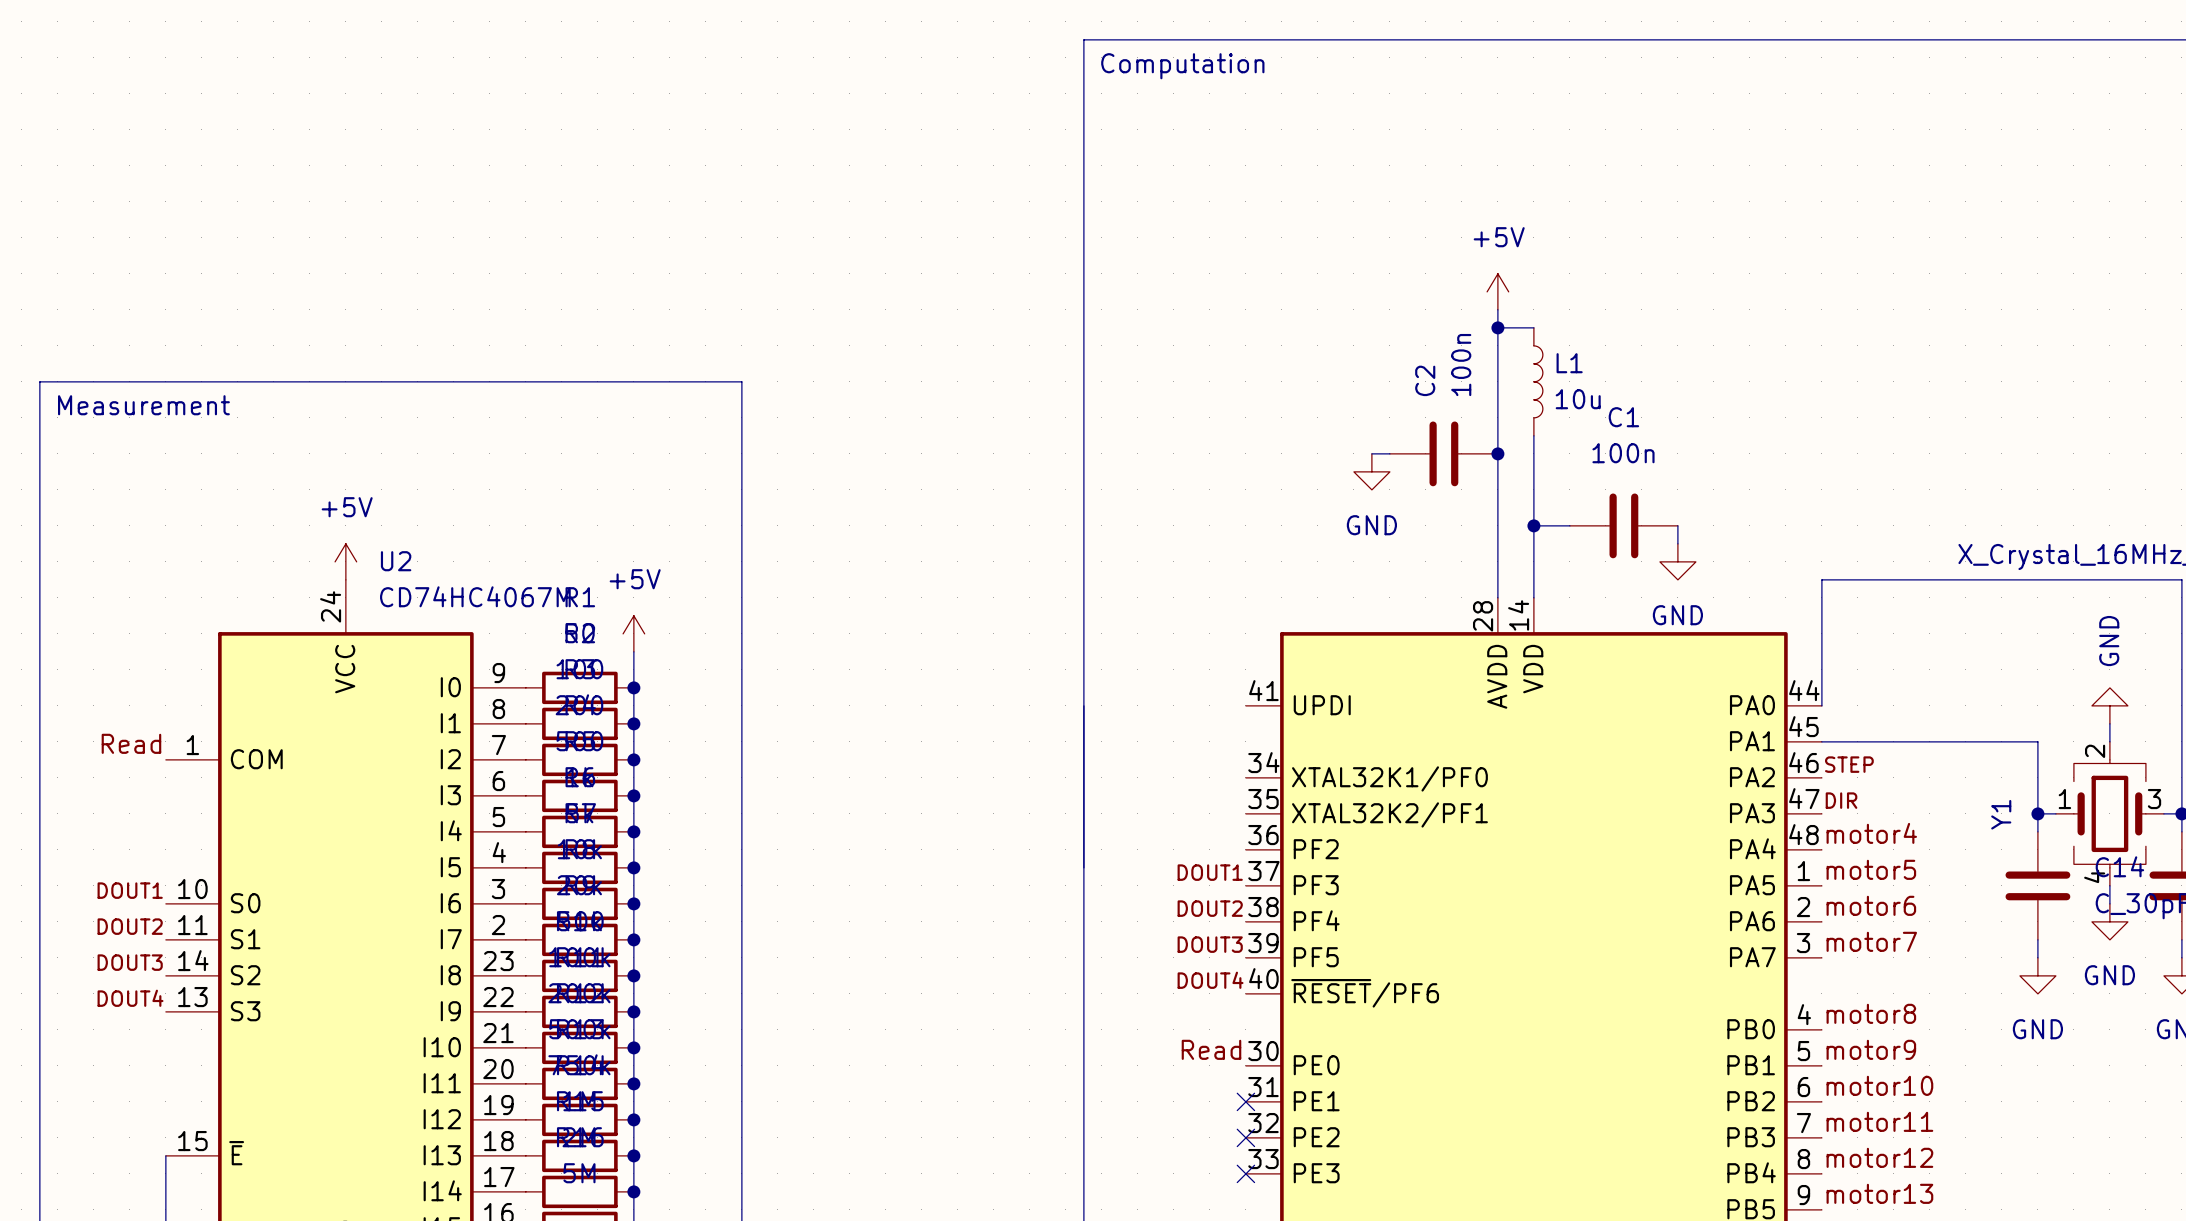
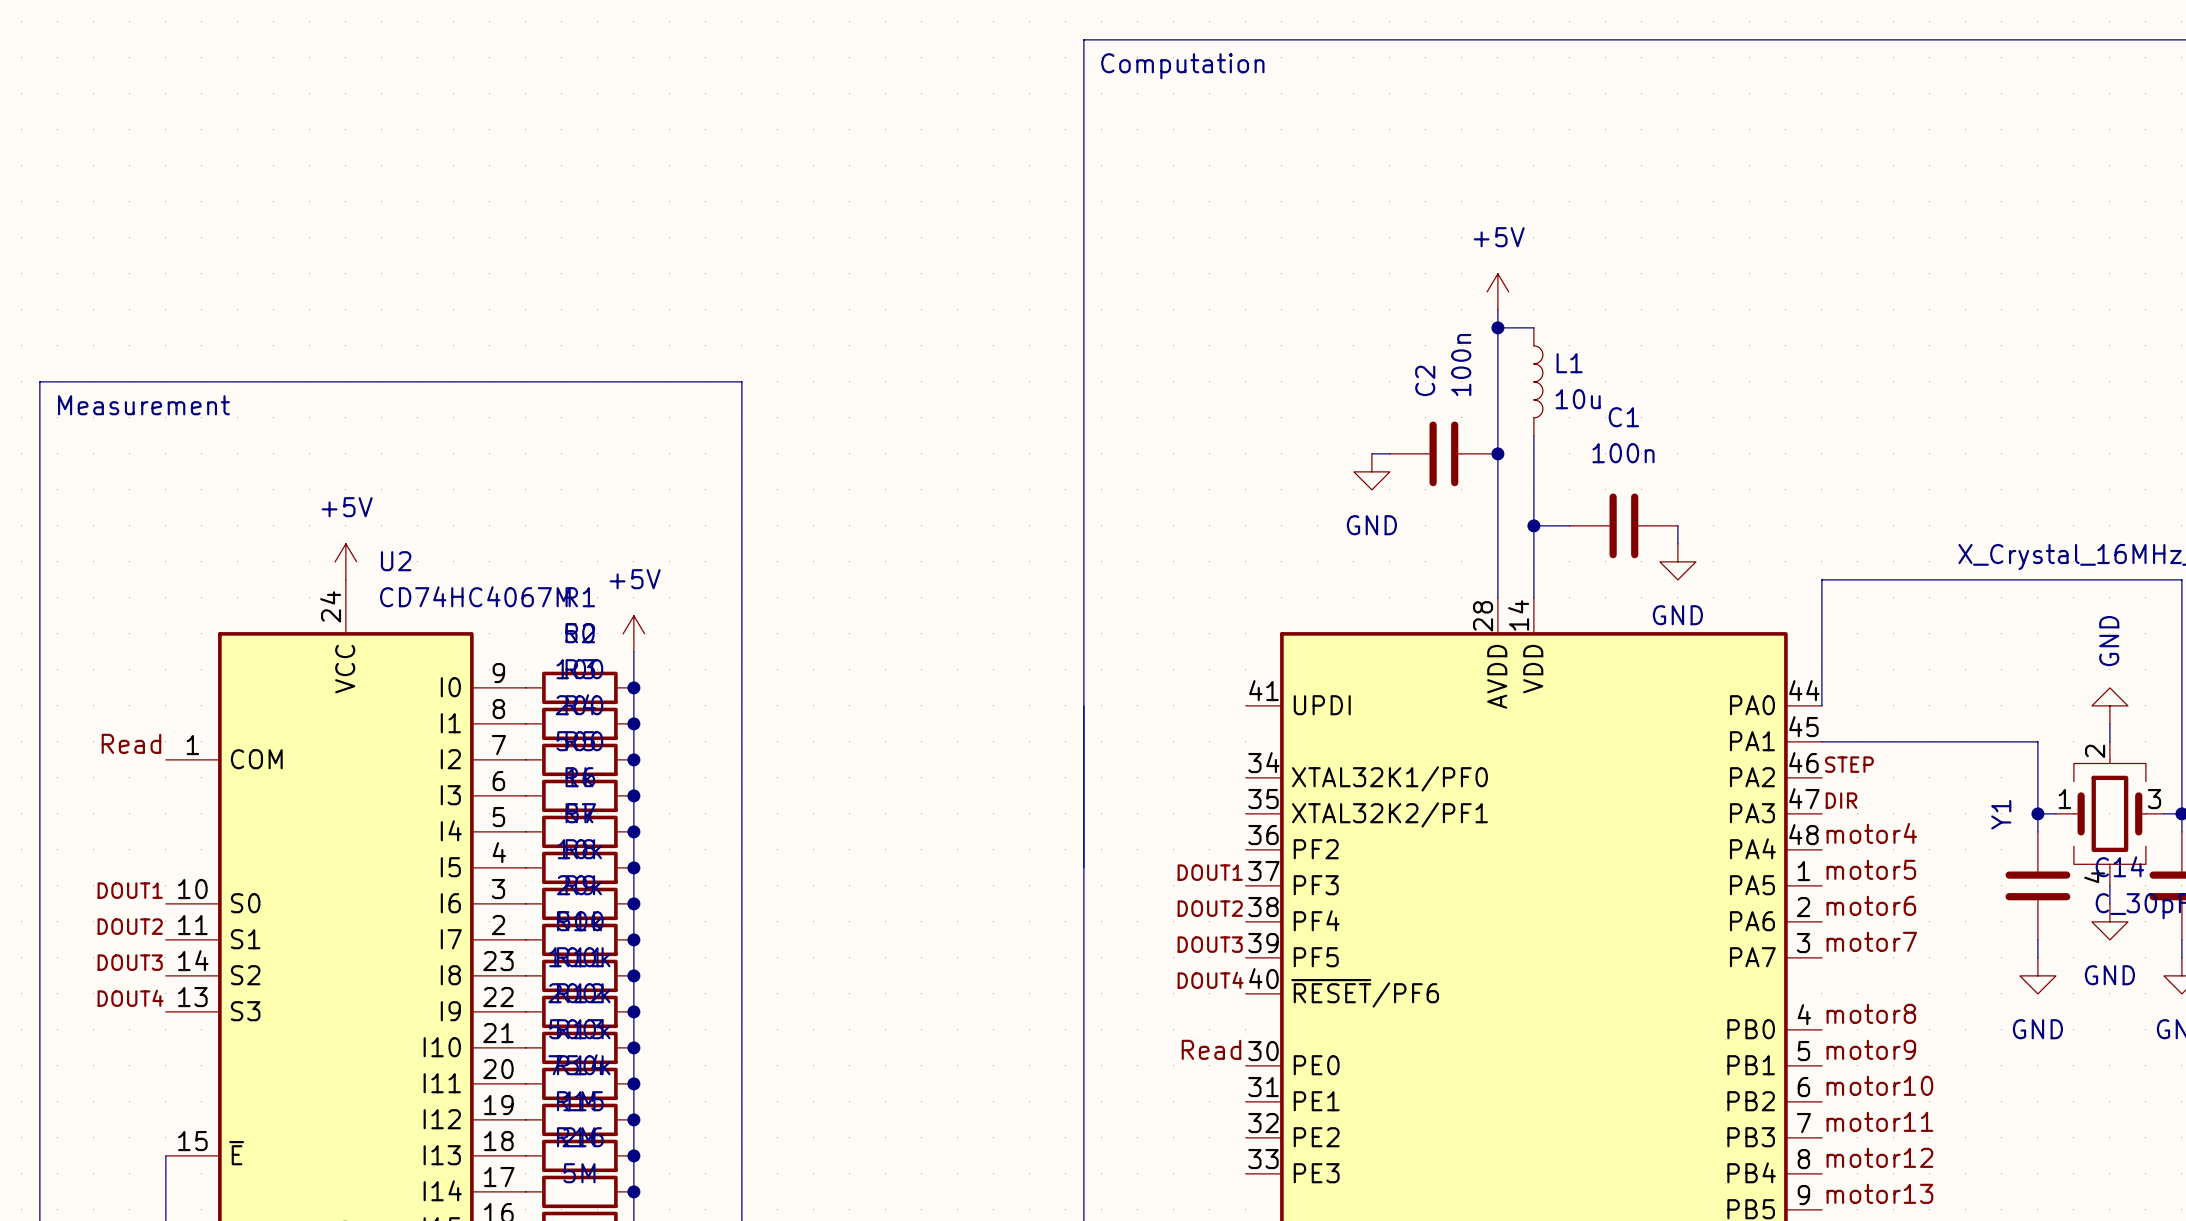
no-connect mark: (1245, 1101) -> none
no-connect mark: (1245, 1137) -> none
no-connect mark: (1245, 1173) -> none

